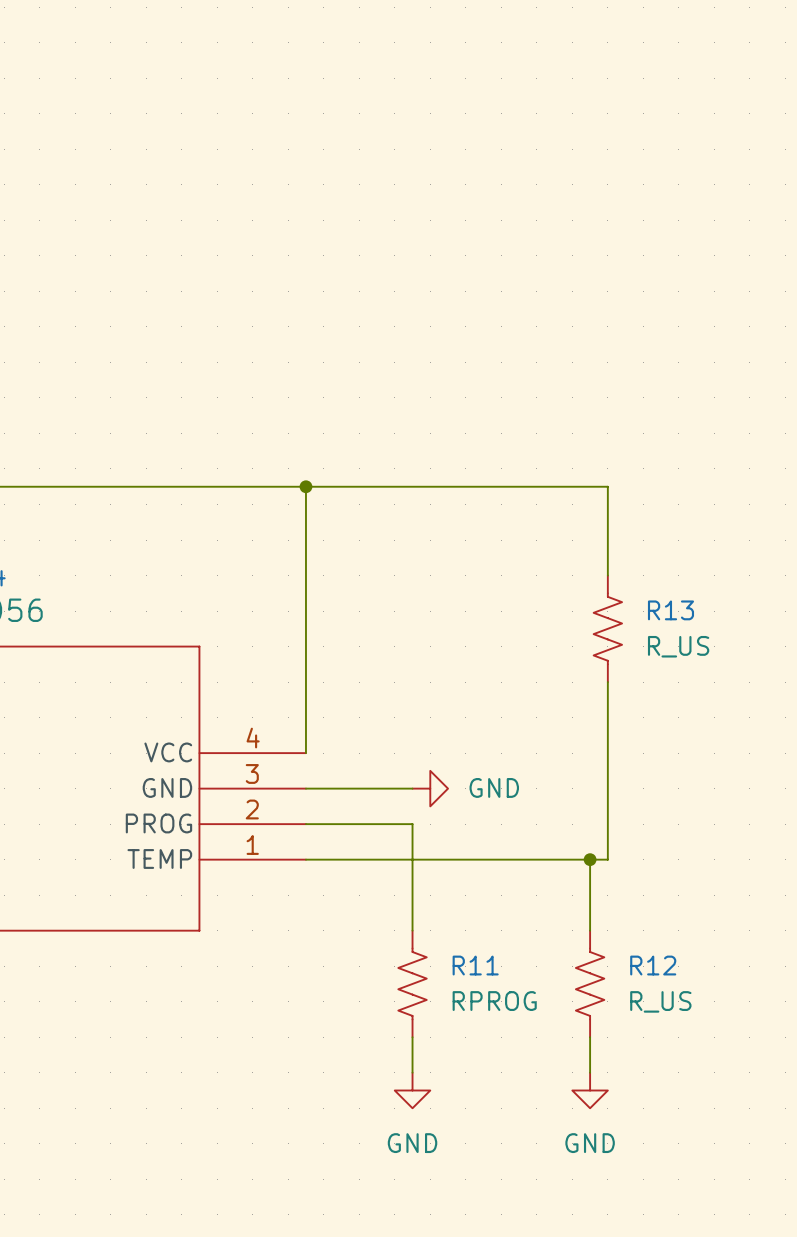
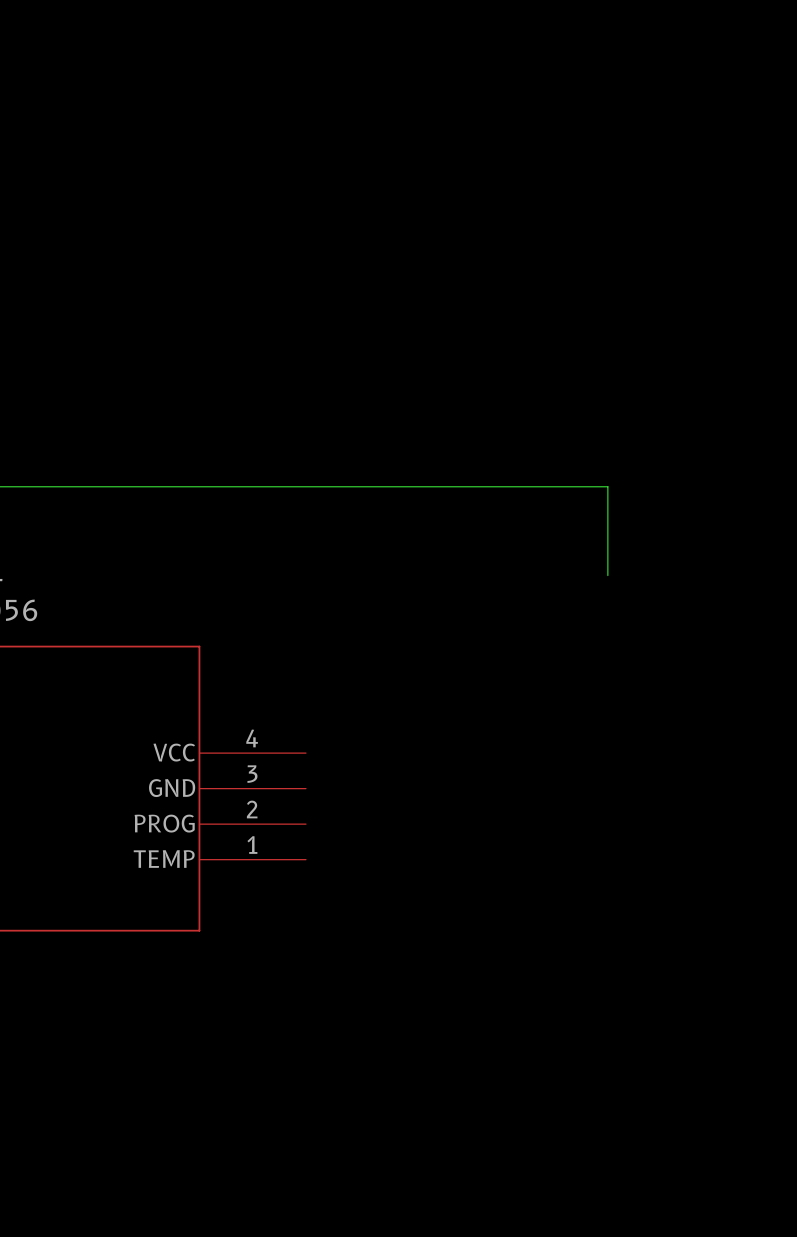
wire: (305, 486) (305, 753) -> none
junction: (305, 486) -> none
R13: R_US (607, 628) -> none
wire: (607, 682) (607, 859) (305, 859) -> none
wire: (305, 788) (412, 788) -> none
power symbol: GND (430, 788) -> none
wire: (305, 824) (412, 824) (412, 930) -> none
wire: (590, 859) (590, 930) -> none
junction: (590, 859) -> none
R11: RPROG (412, 983) -> none
R12: R_US (590, 983) -> none
wire: (412, 1037) (412, 1072) -> none
wire: (590, 1037) (590, 1072) -> none
power symbol: GND (412, 1090) -> none
power symbol: GND (590, 1090) -> none

